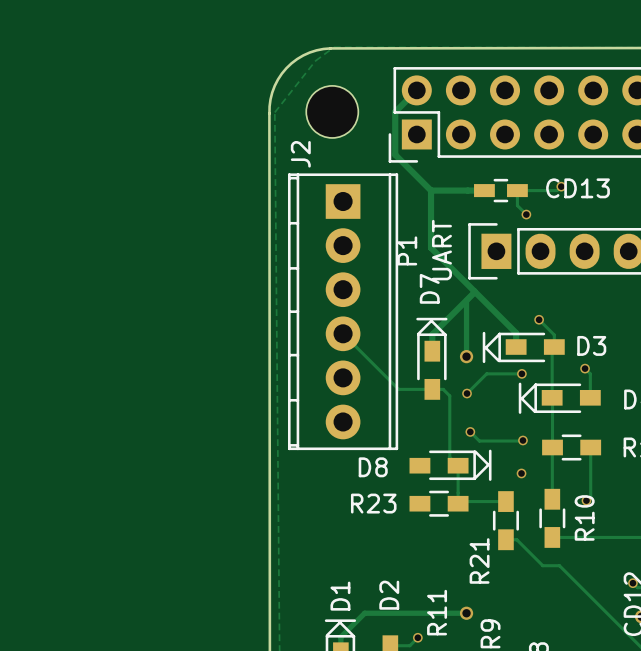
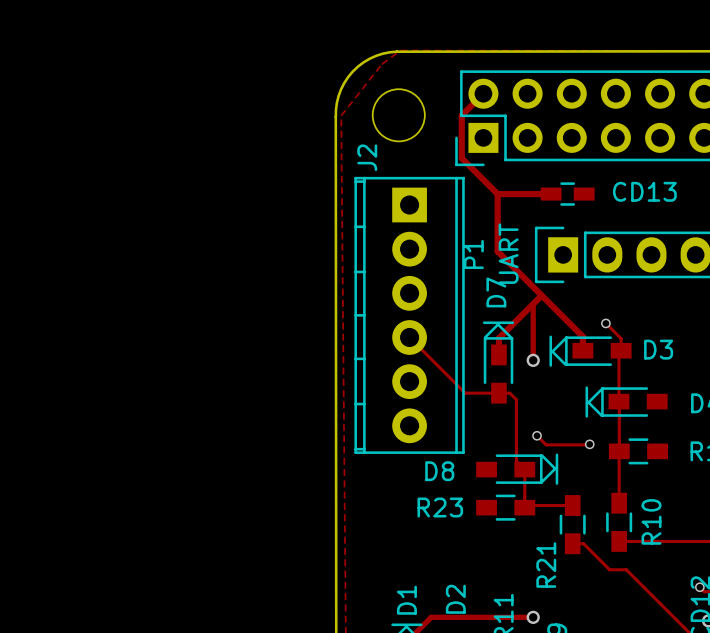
track: (560, 186) (557, 190) (517, 190) (517, 205) (526, 214) -> none
via: (561, 186) -> none
via: (526, 214) -> none
track: (585, 368) (590, 373) (590, 397) -> none
via: (585, 368) -> none
track: (521, 373) (486, 373) (467, 393) -> none
via: (521, 373) -> none
via: (467, 393) -> none
track: (590, 447) (590, 496) (586, 500) -> none
via: (521, 473) -> none
via: (586, 500) -> none

